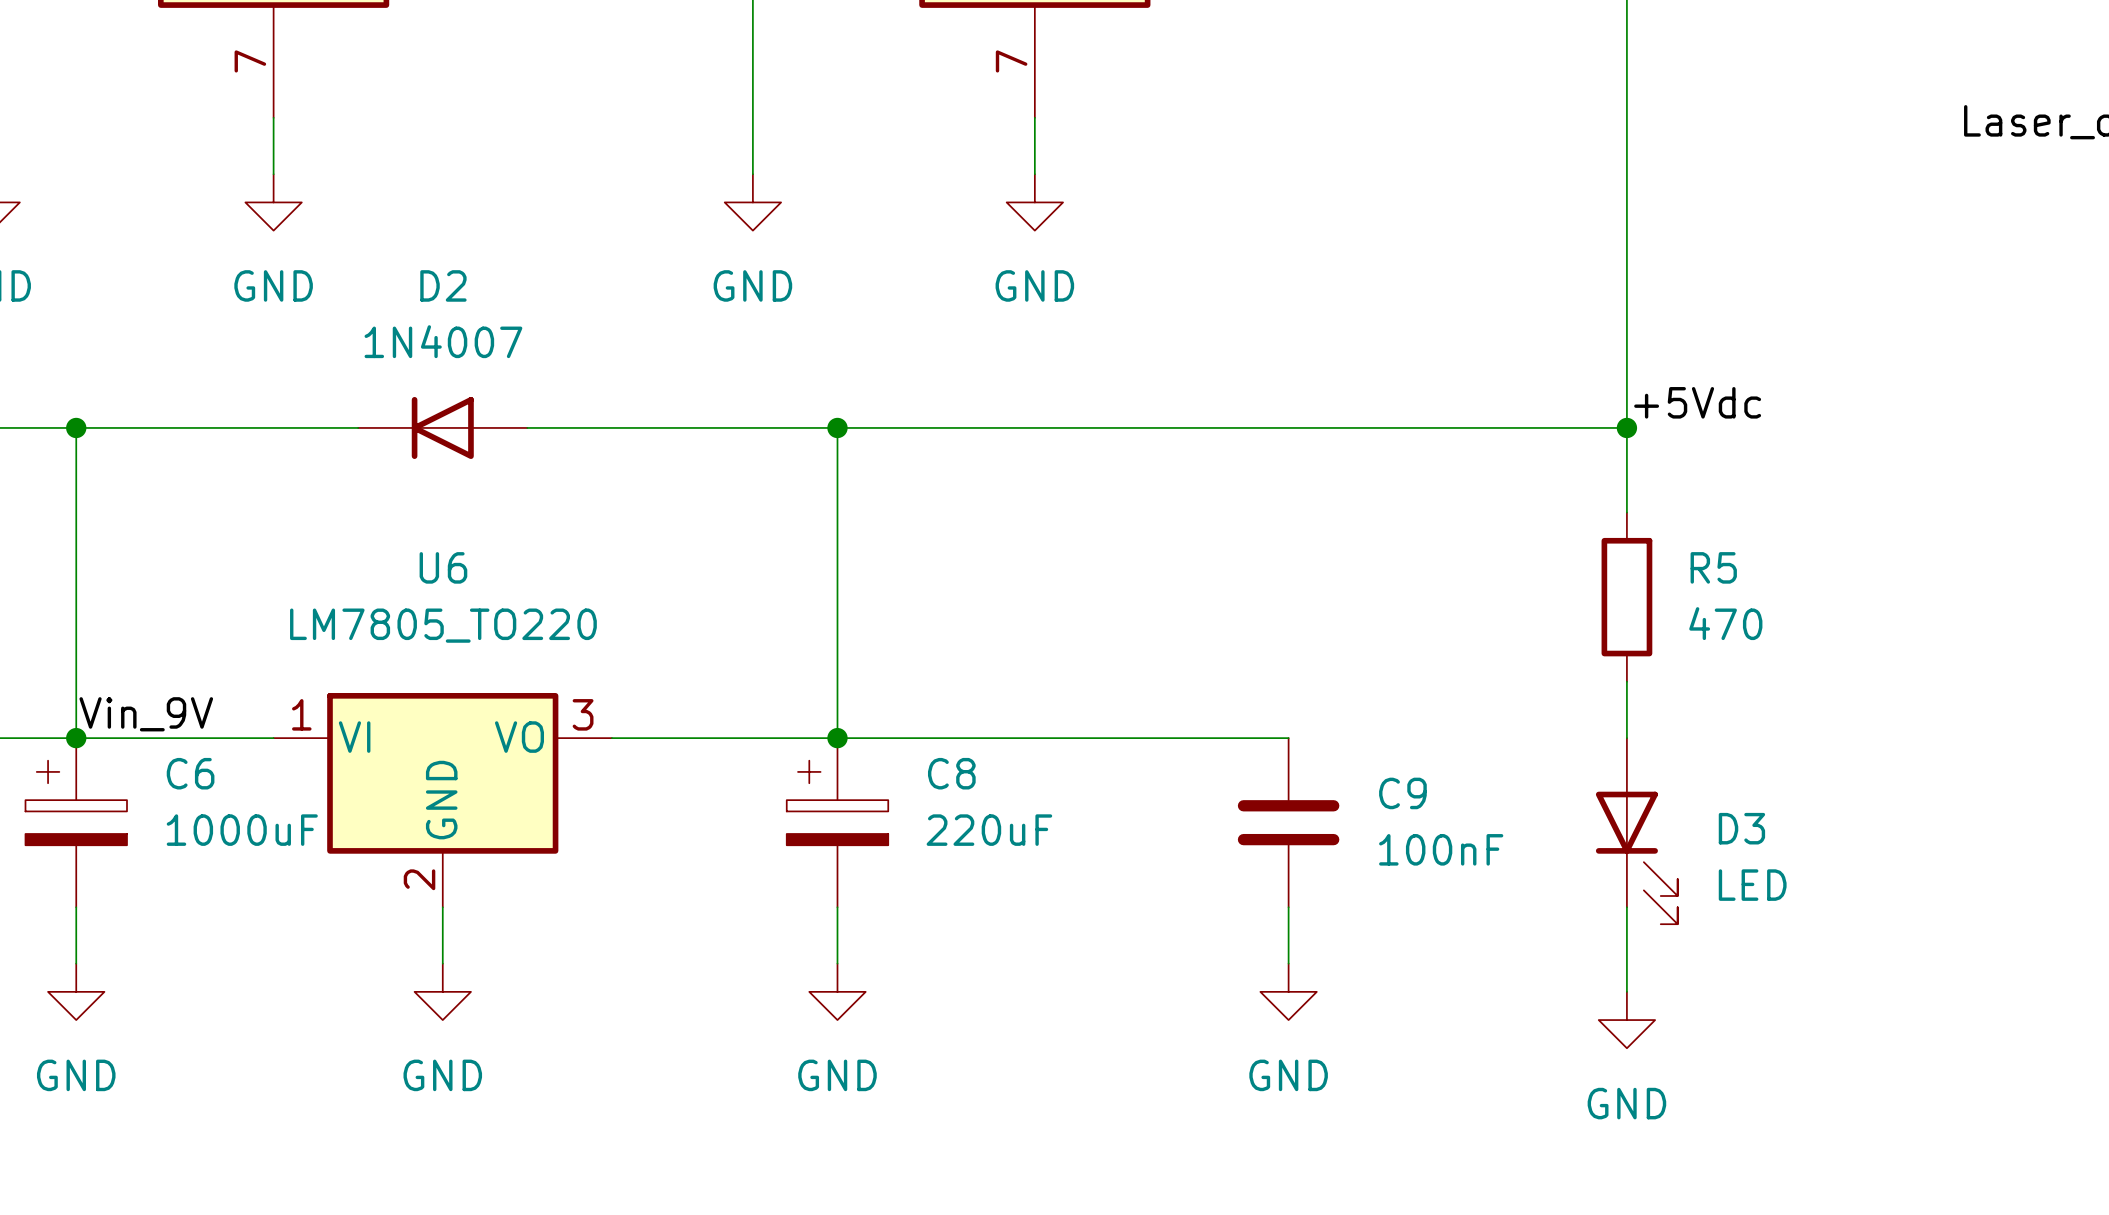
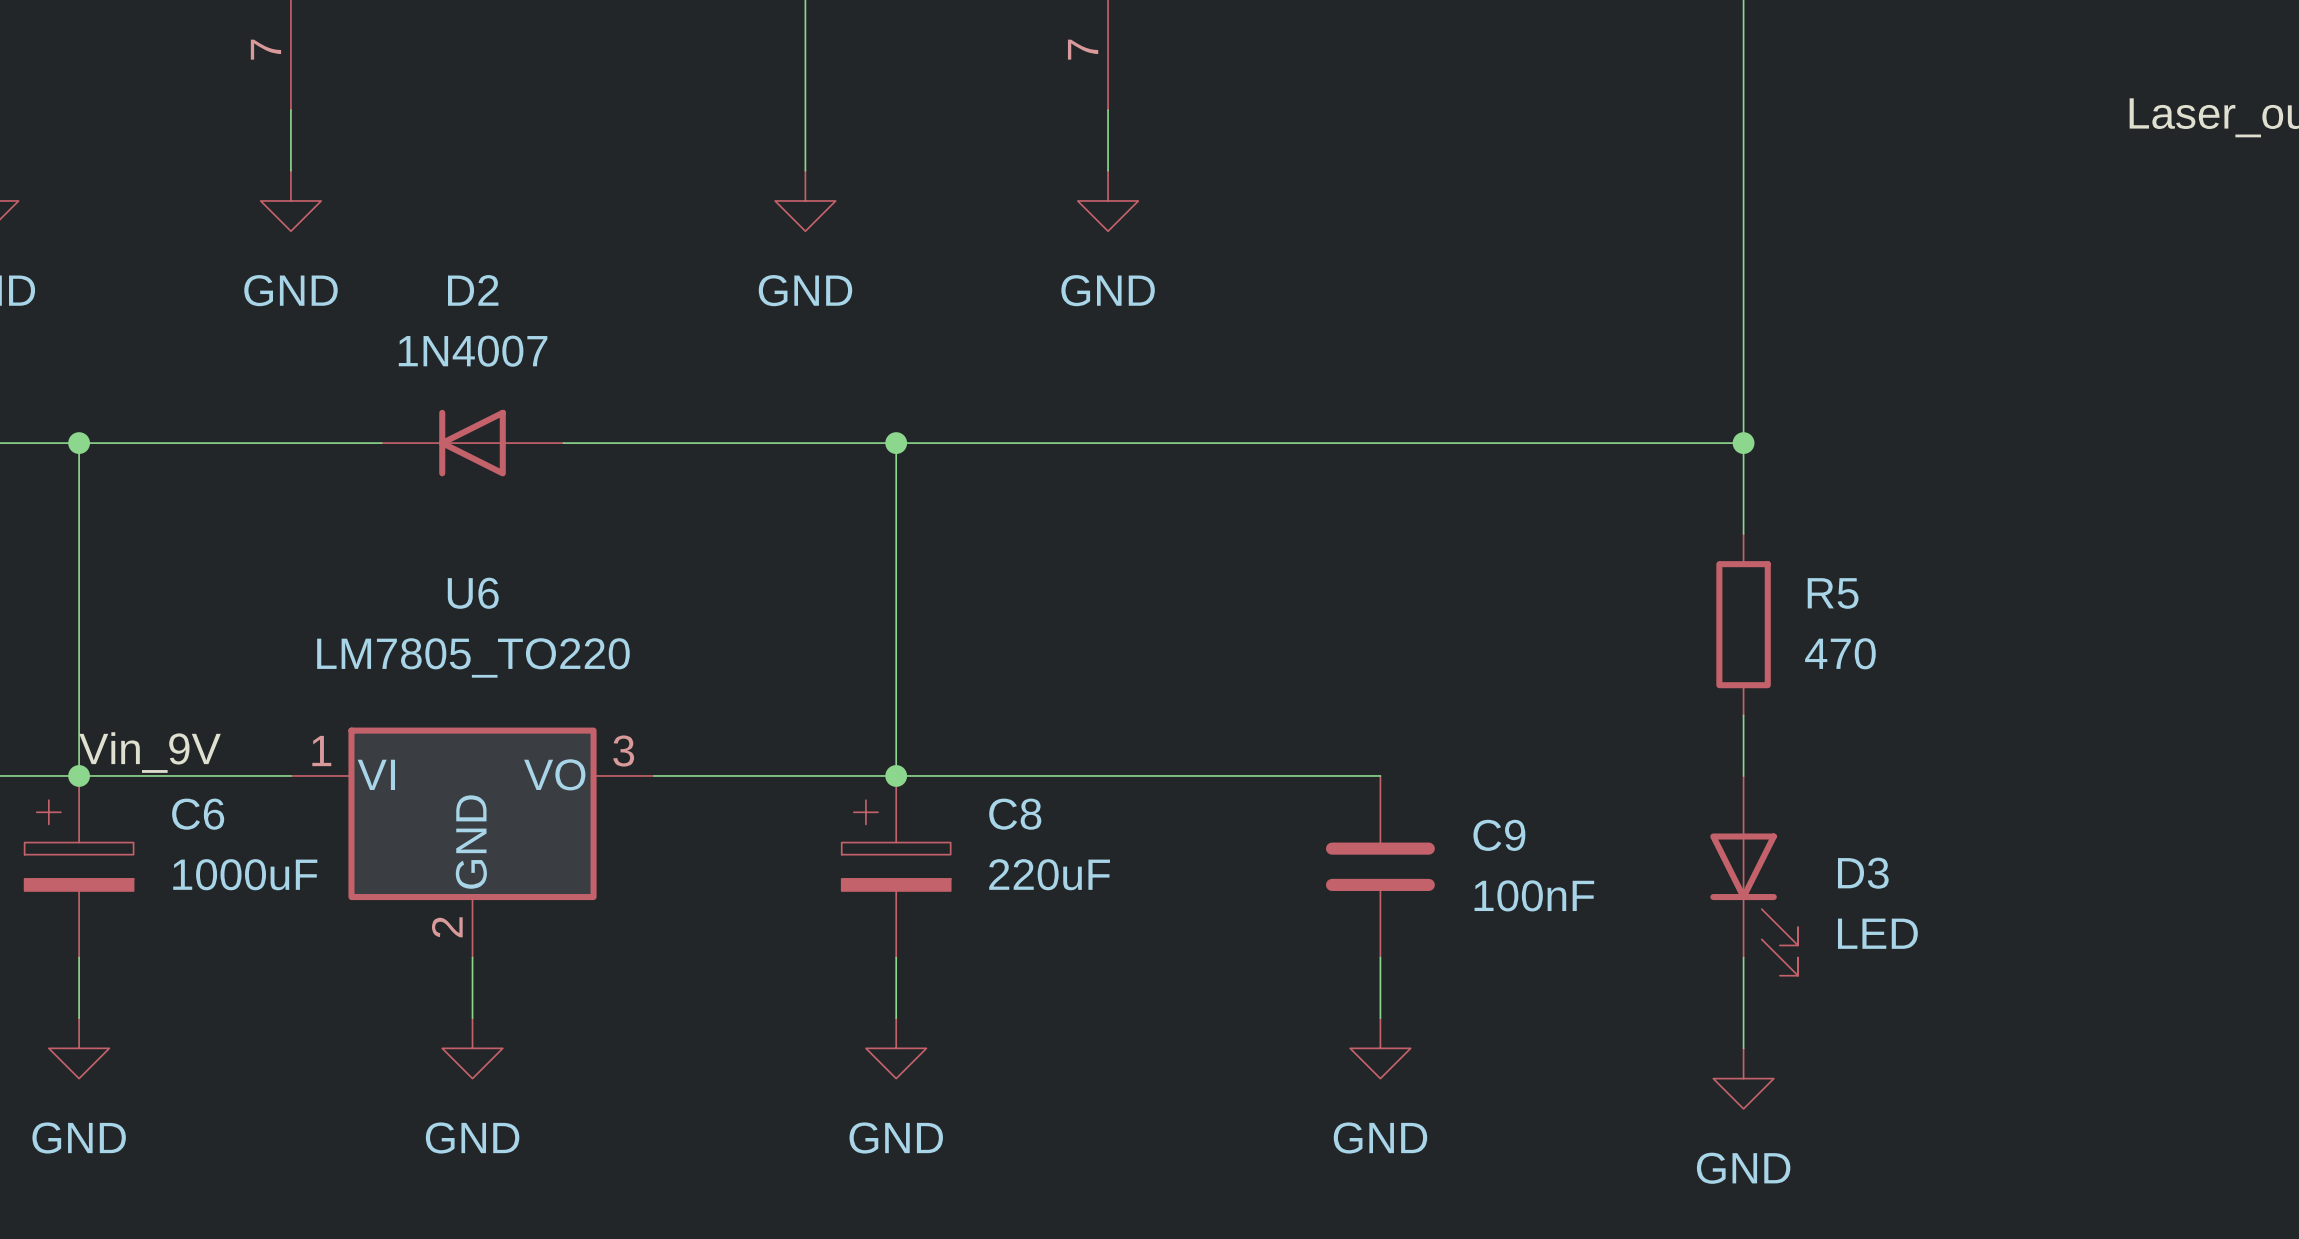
label: +5Vdc (1697, 402) -> none

